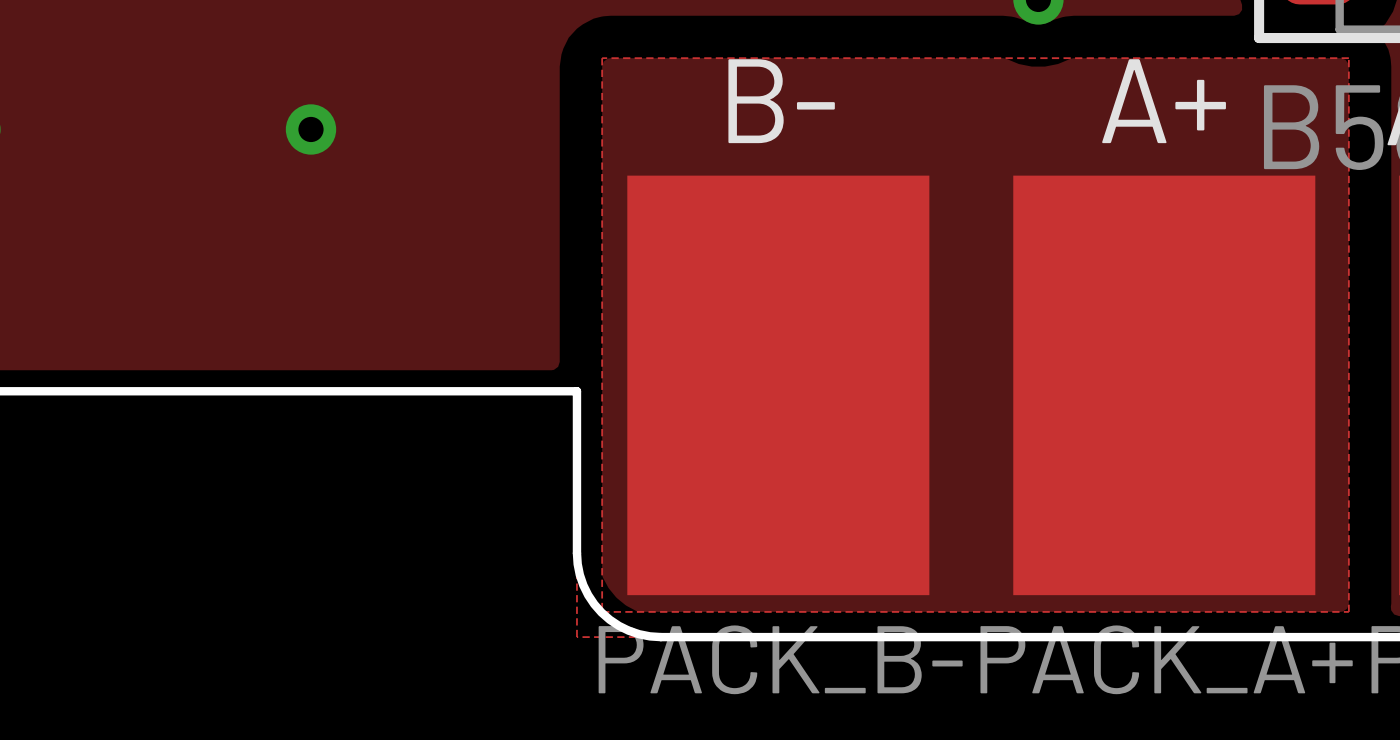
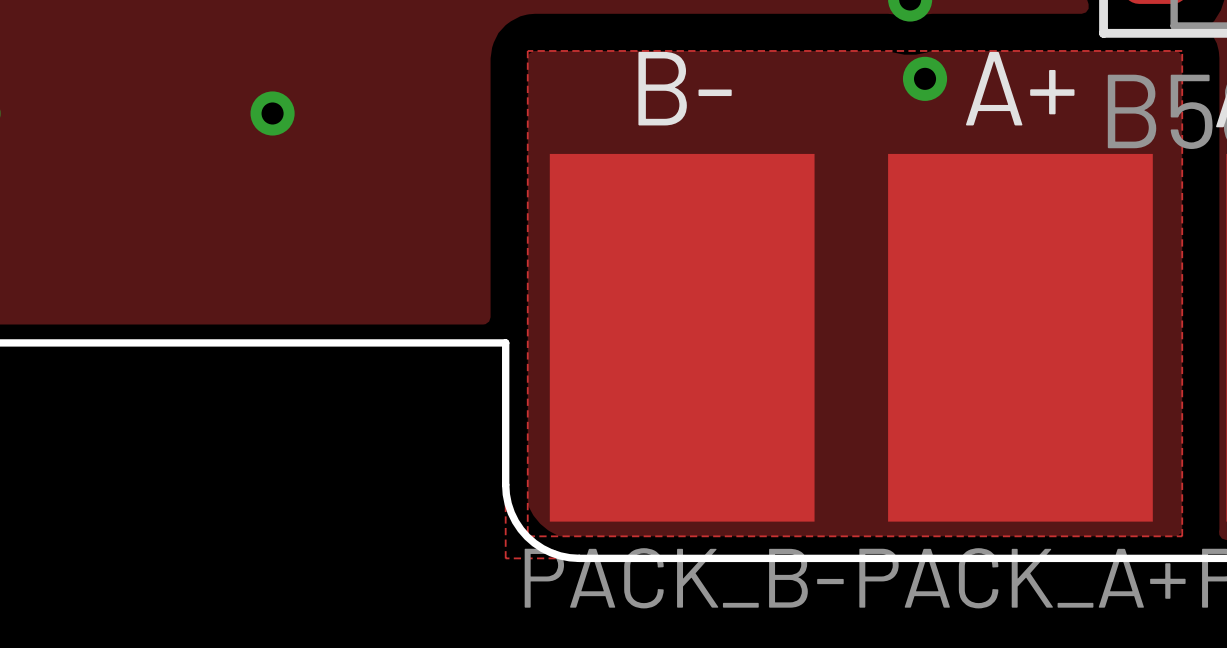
via: none -> (925, 78)

